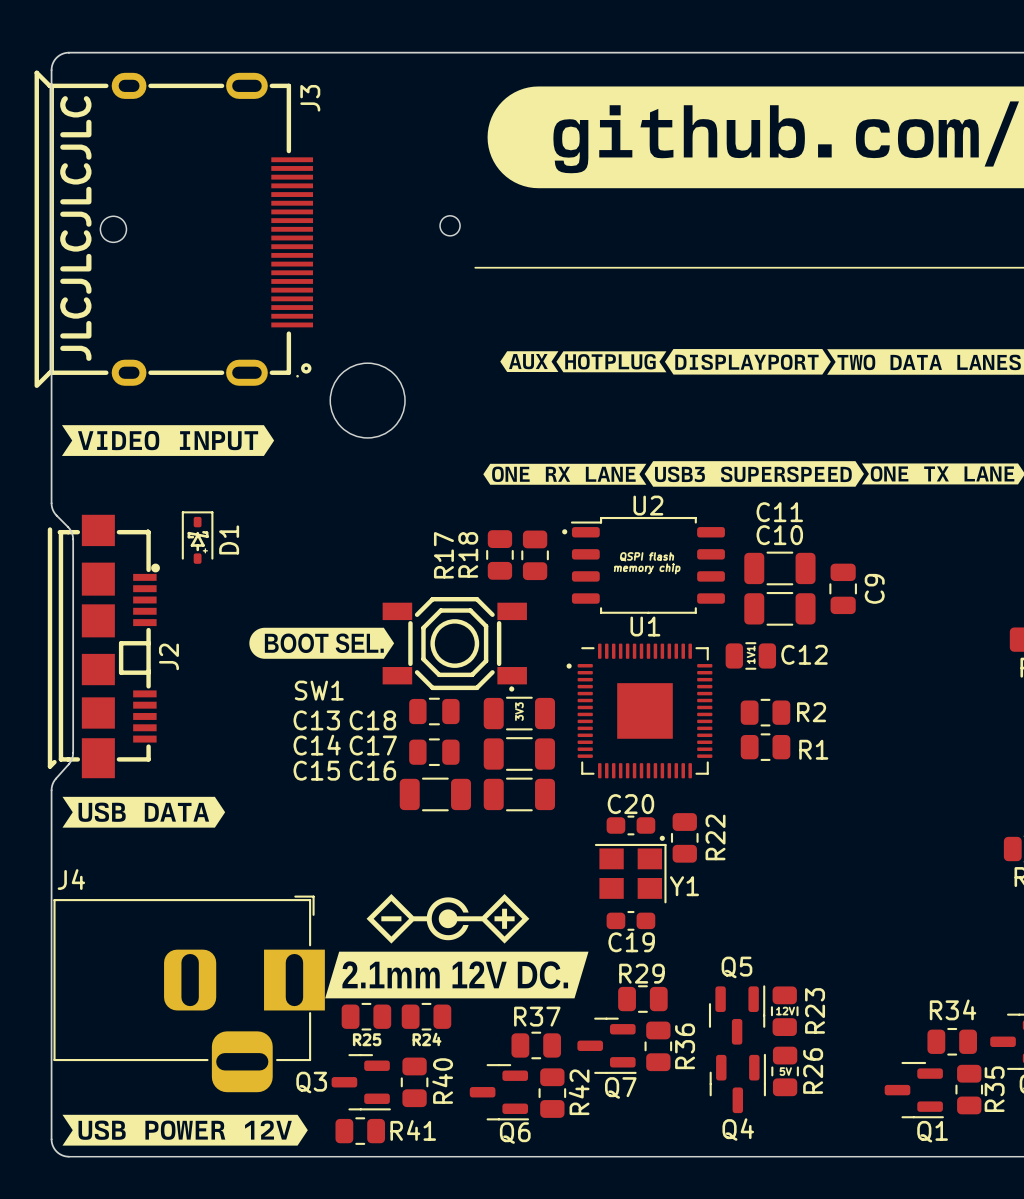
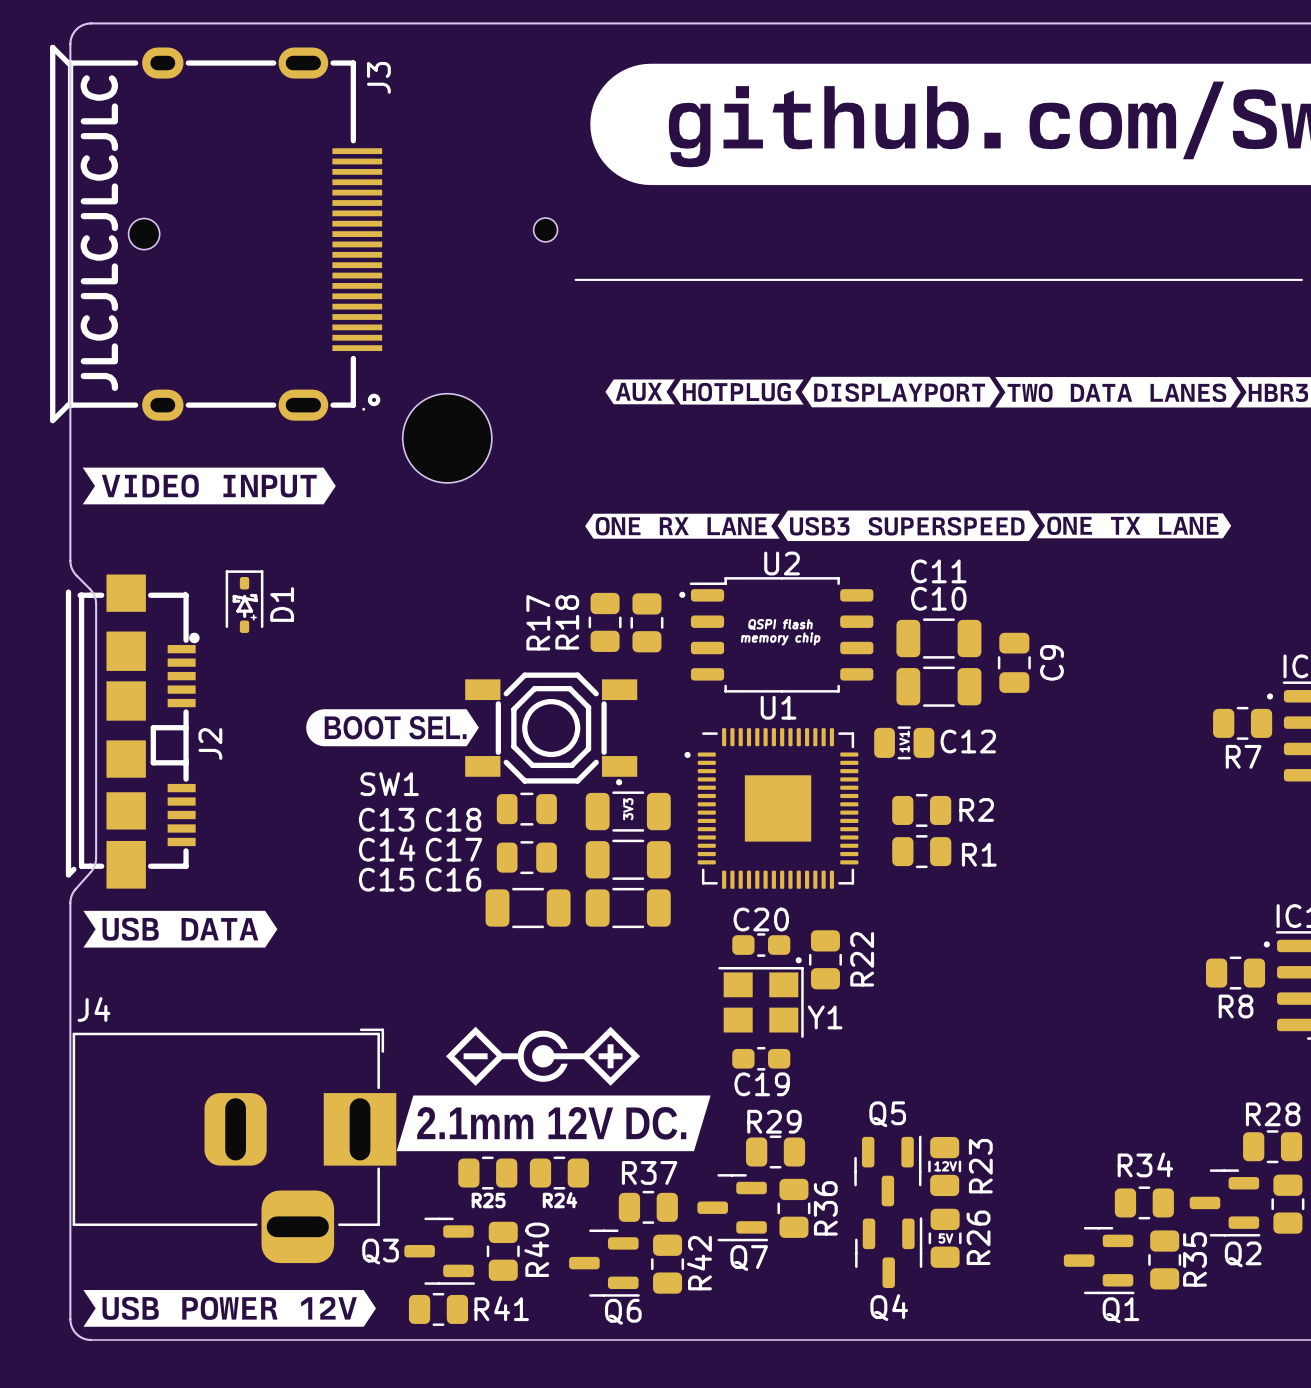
R25 position: (366, 1016) -> (487, 1173)
R24 position: (426, 1016) -> (559, 1173)

